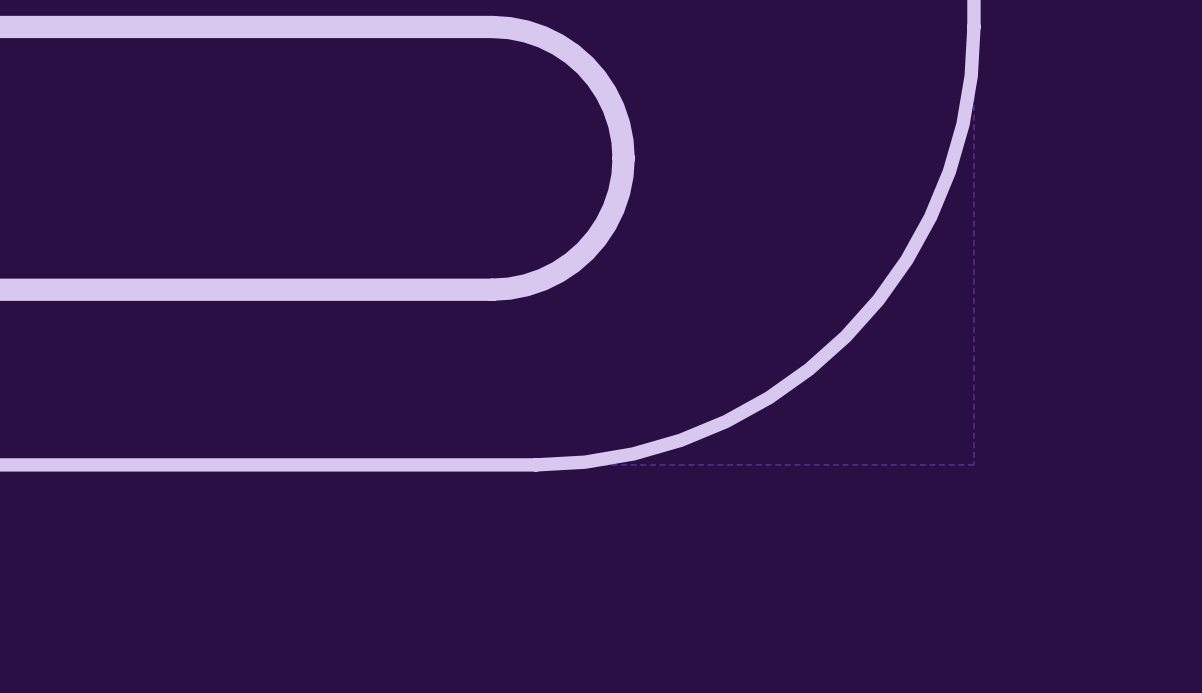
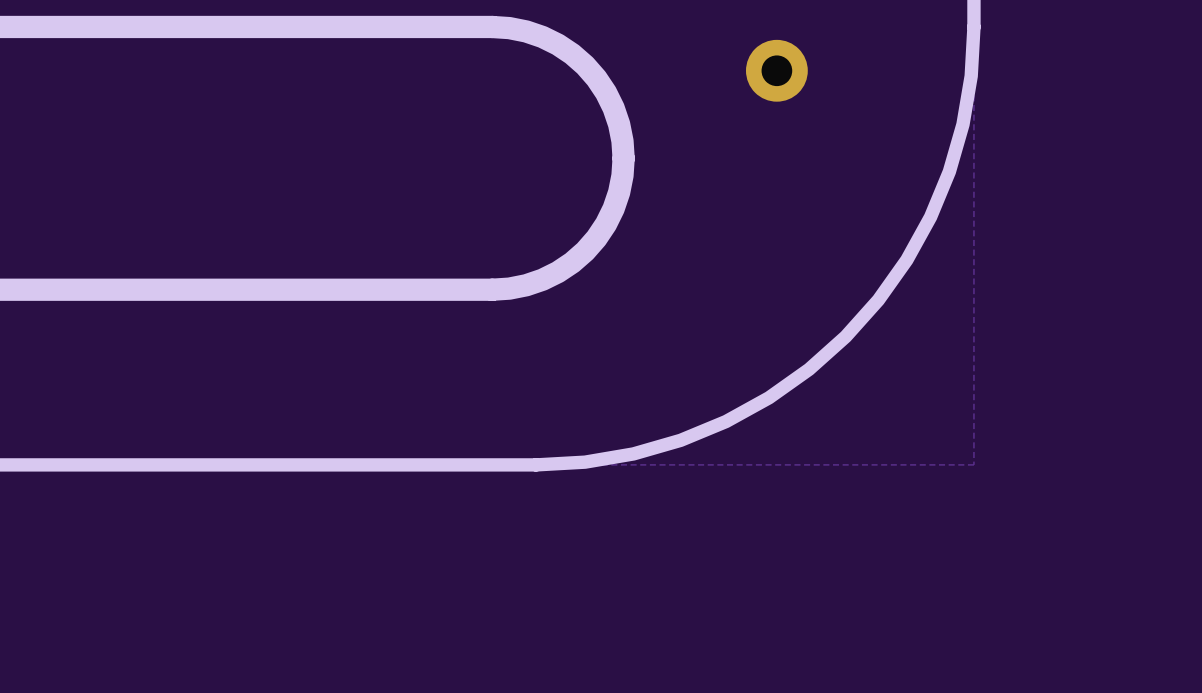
via: none -> (776, 70)

